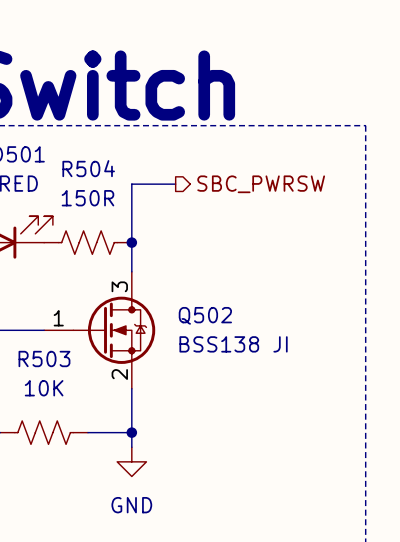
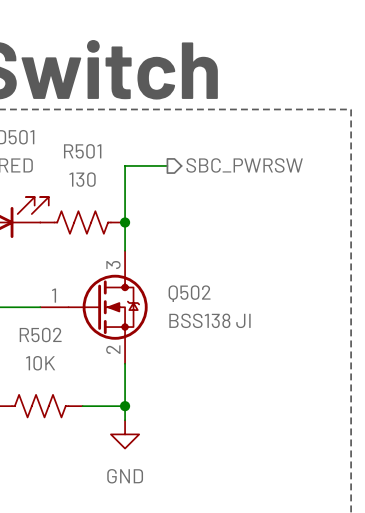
R504 name: R504 (88, 168) -> R501 (82, 151)
R504 value: 150R (87, 198) -> 130 (82, 179)
R503 name: R503 (44, 359) -> R502 (40, 334)

